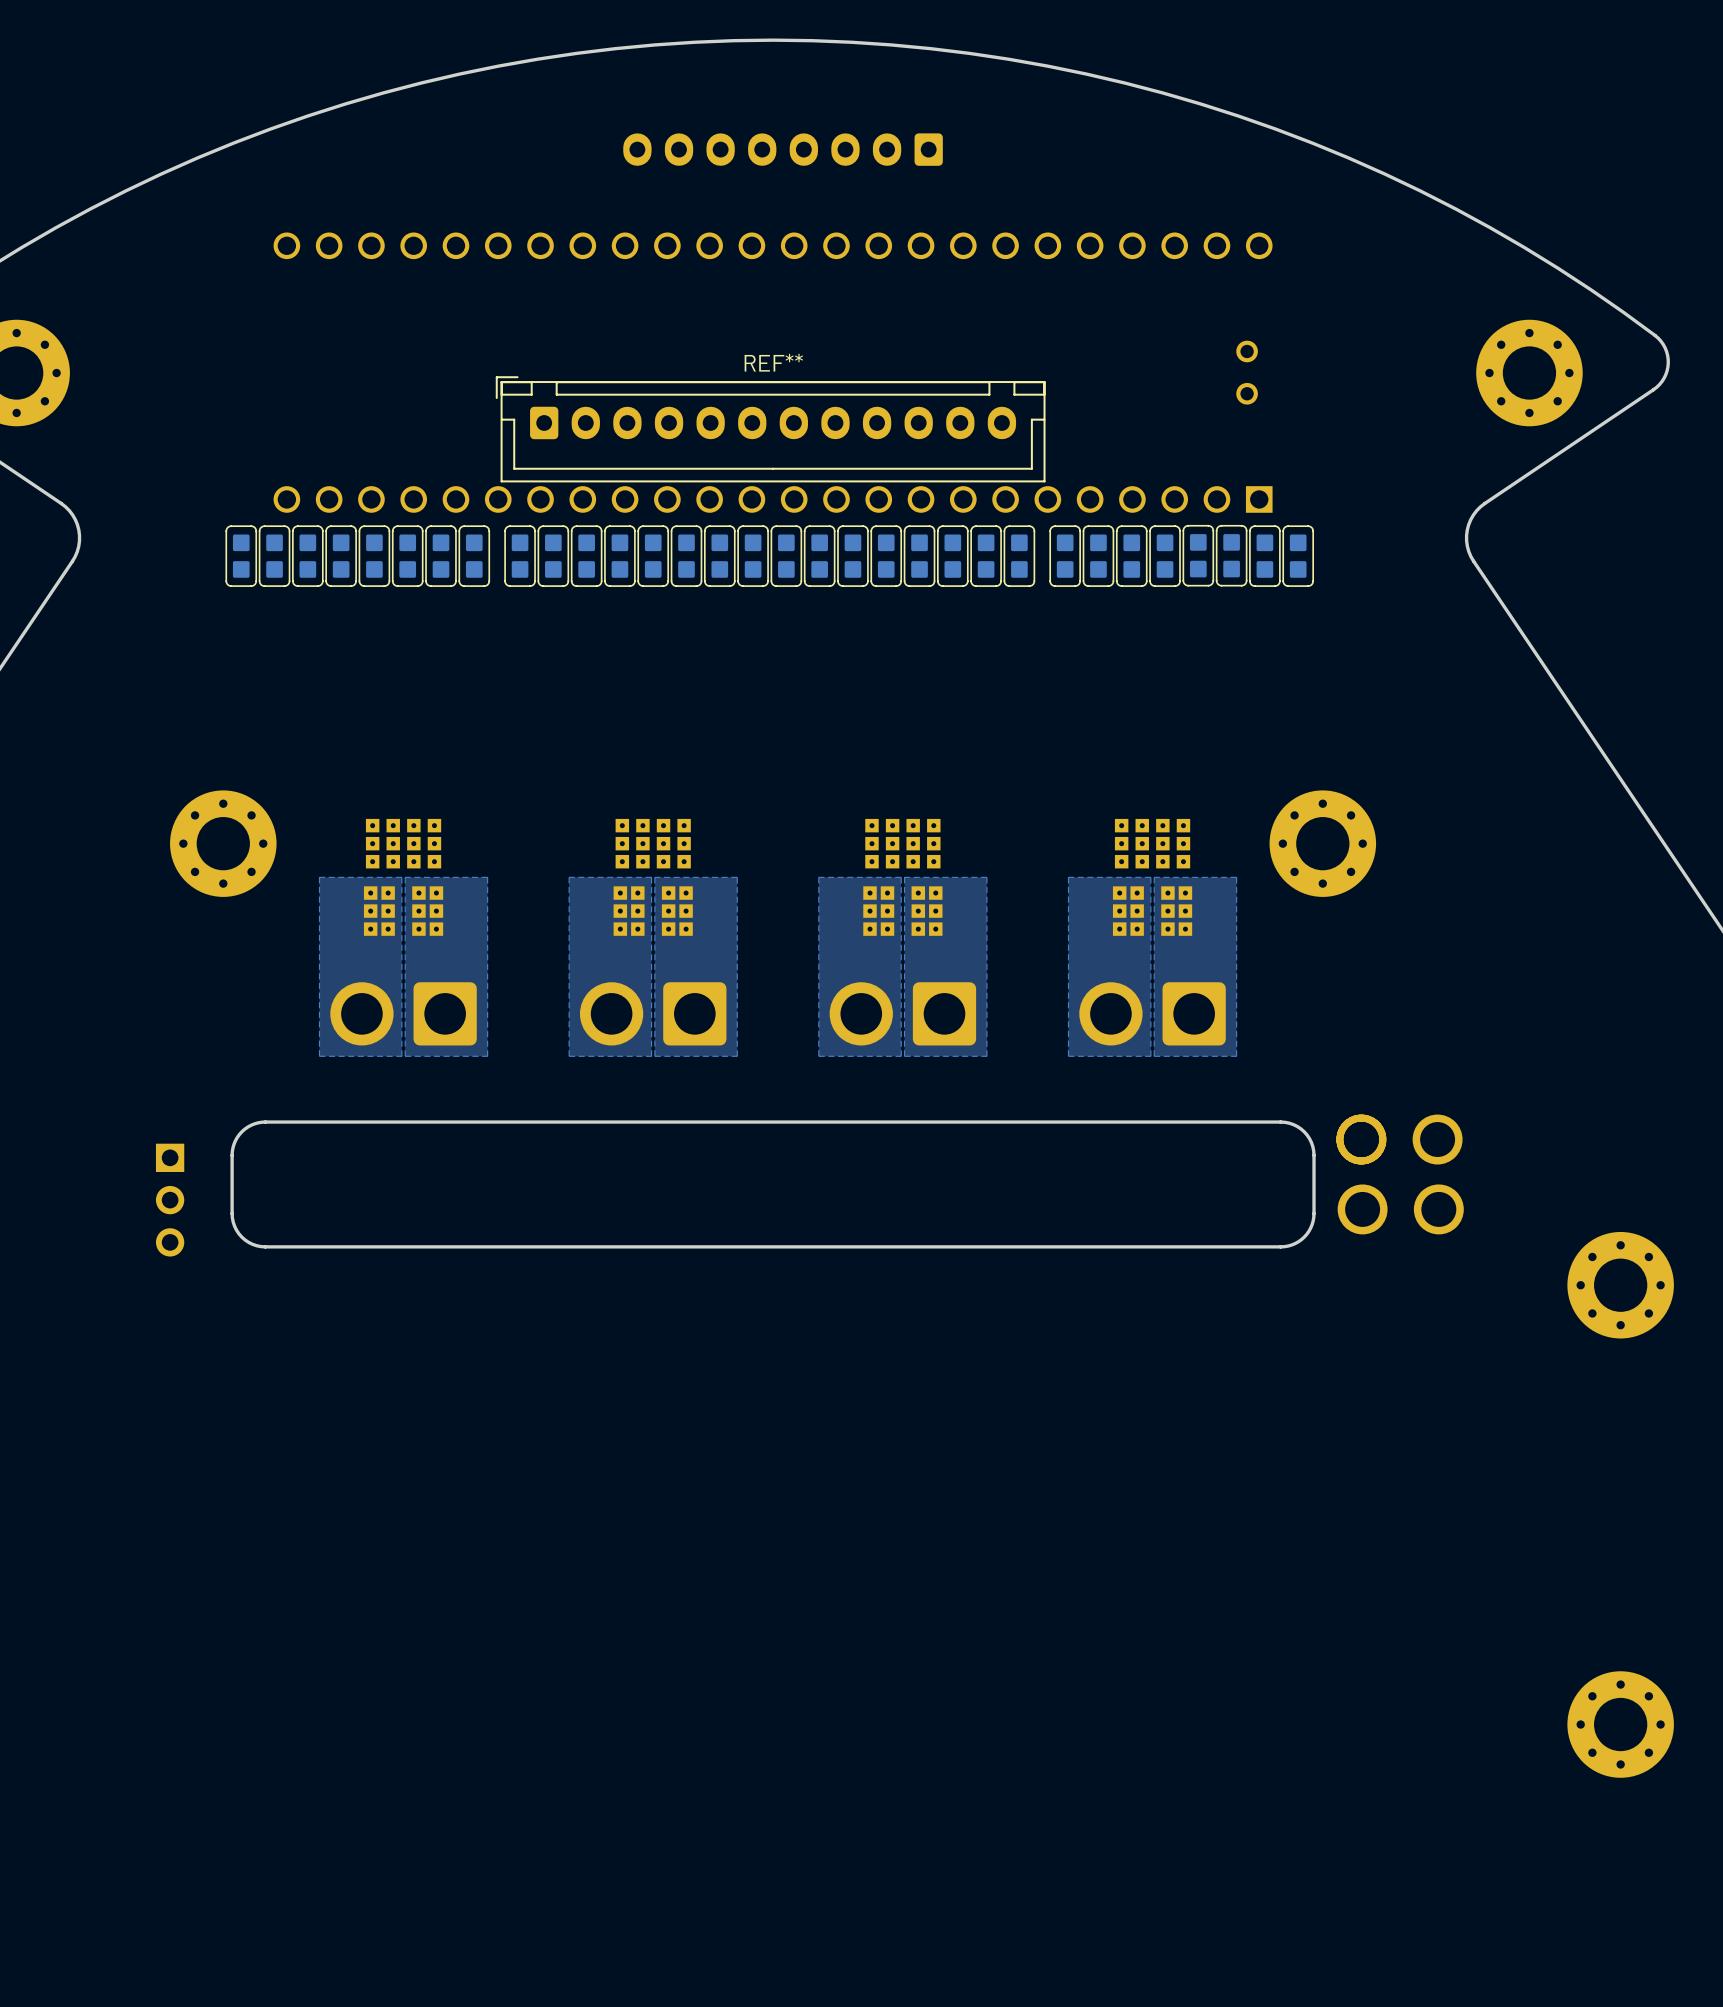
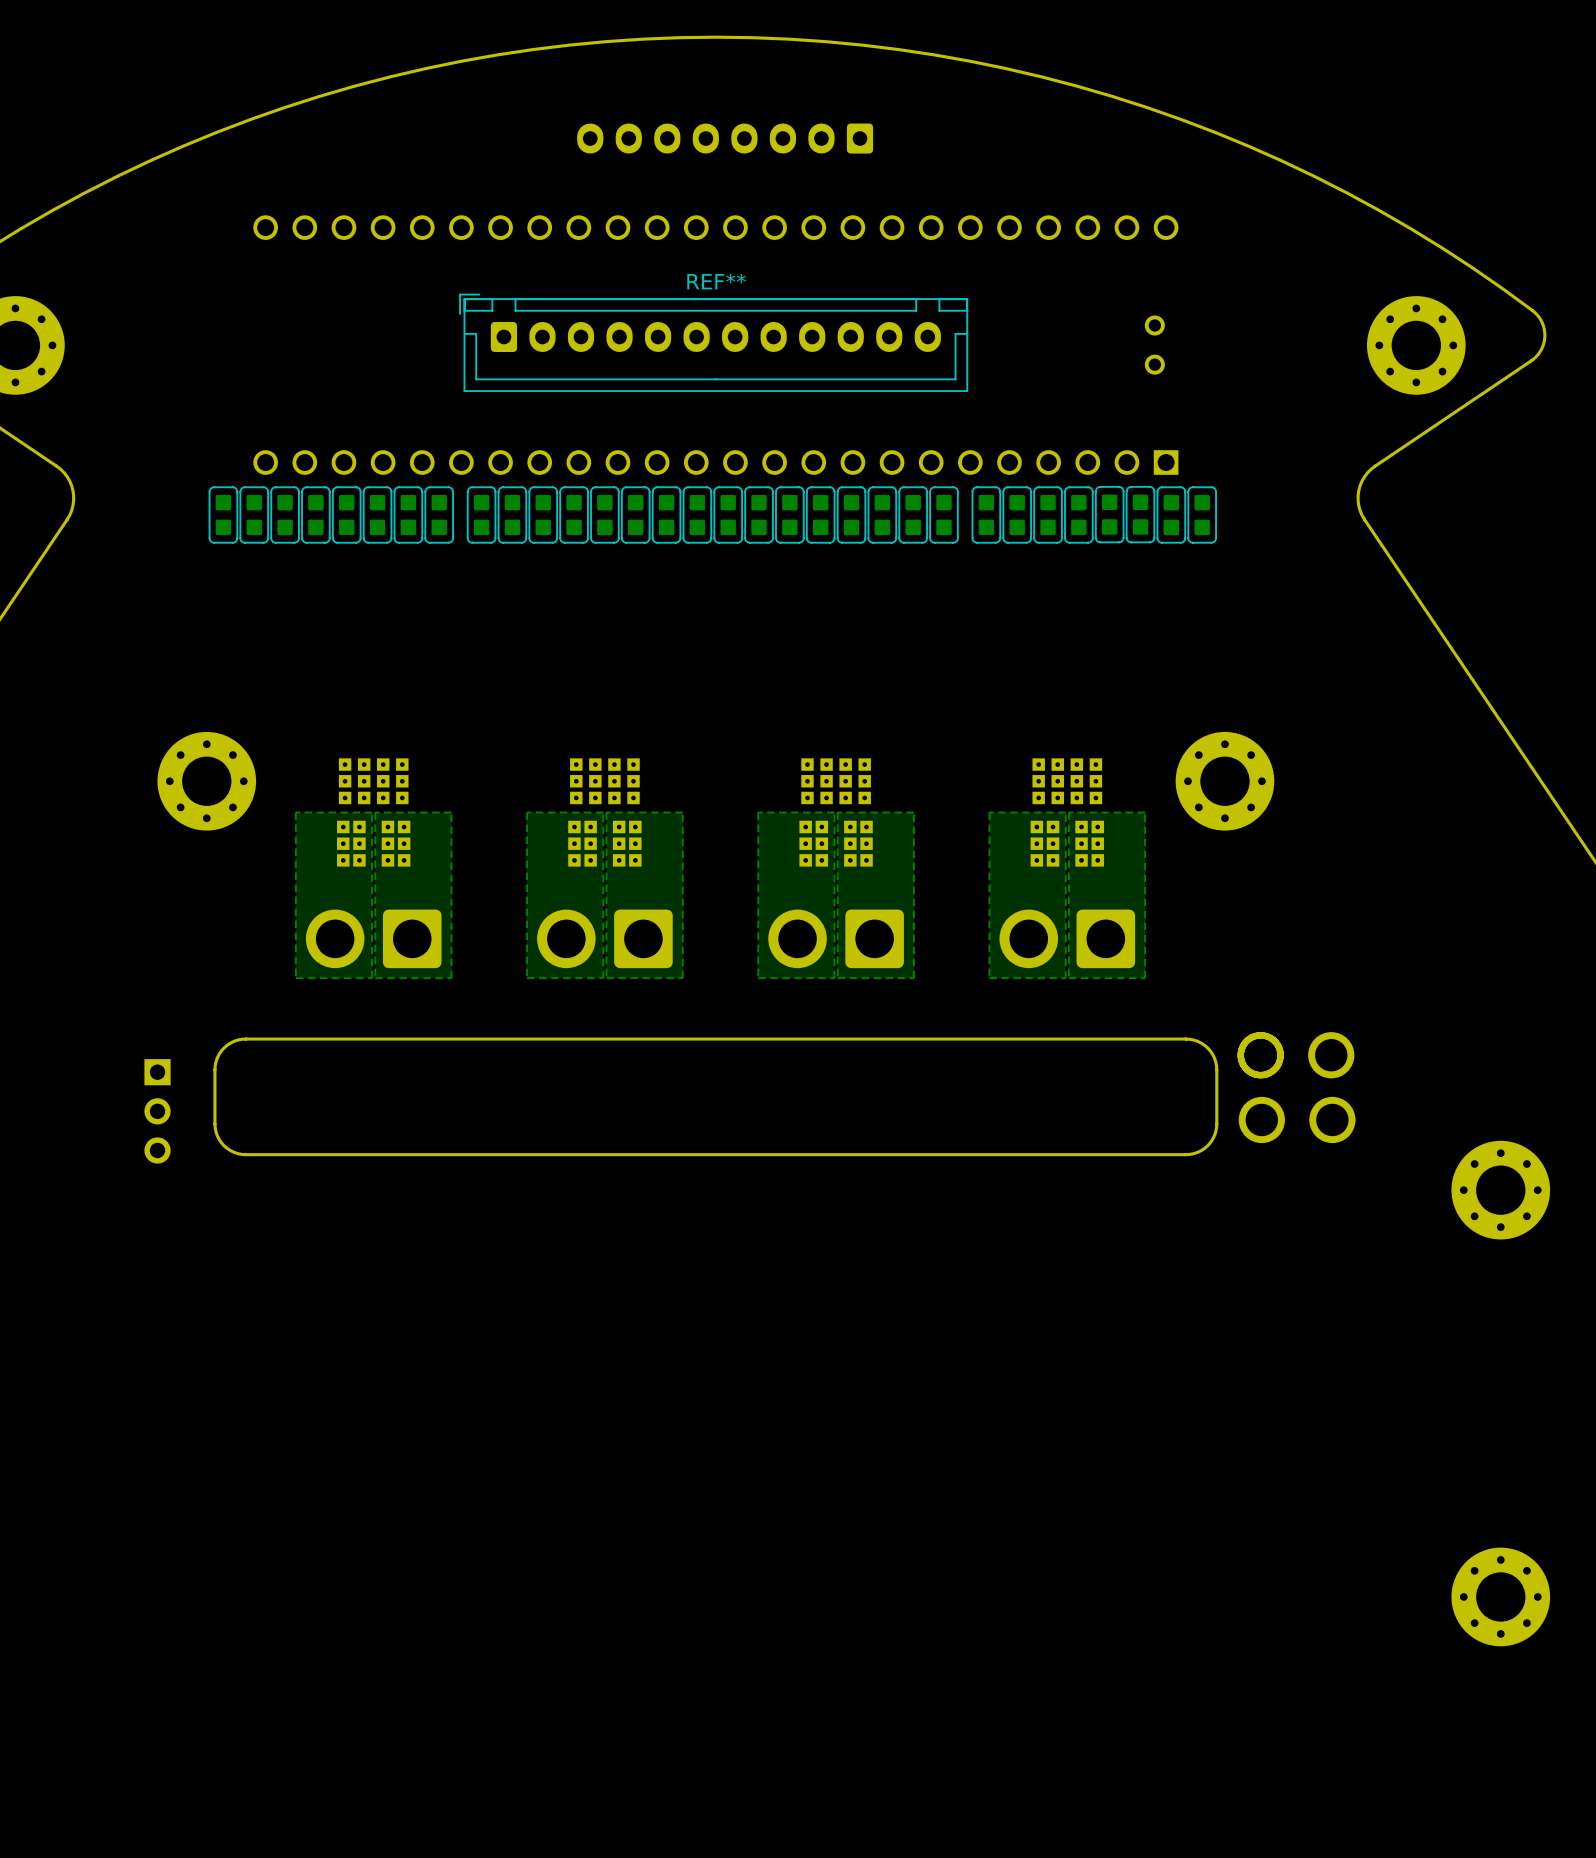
REF** position: (770, 429) -> (713, 342)

